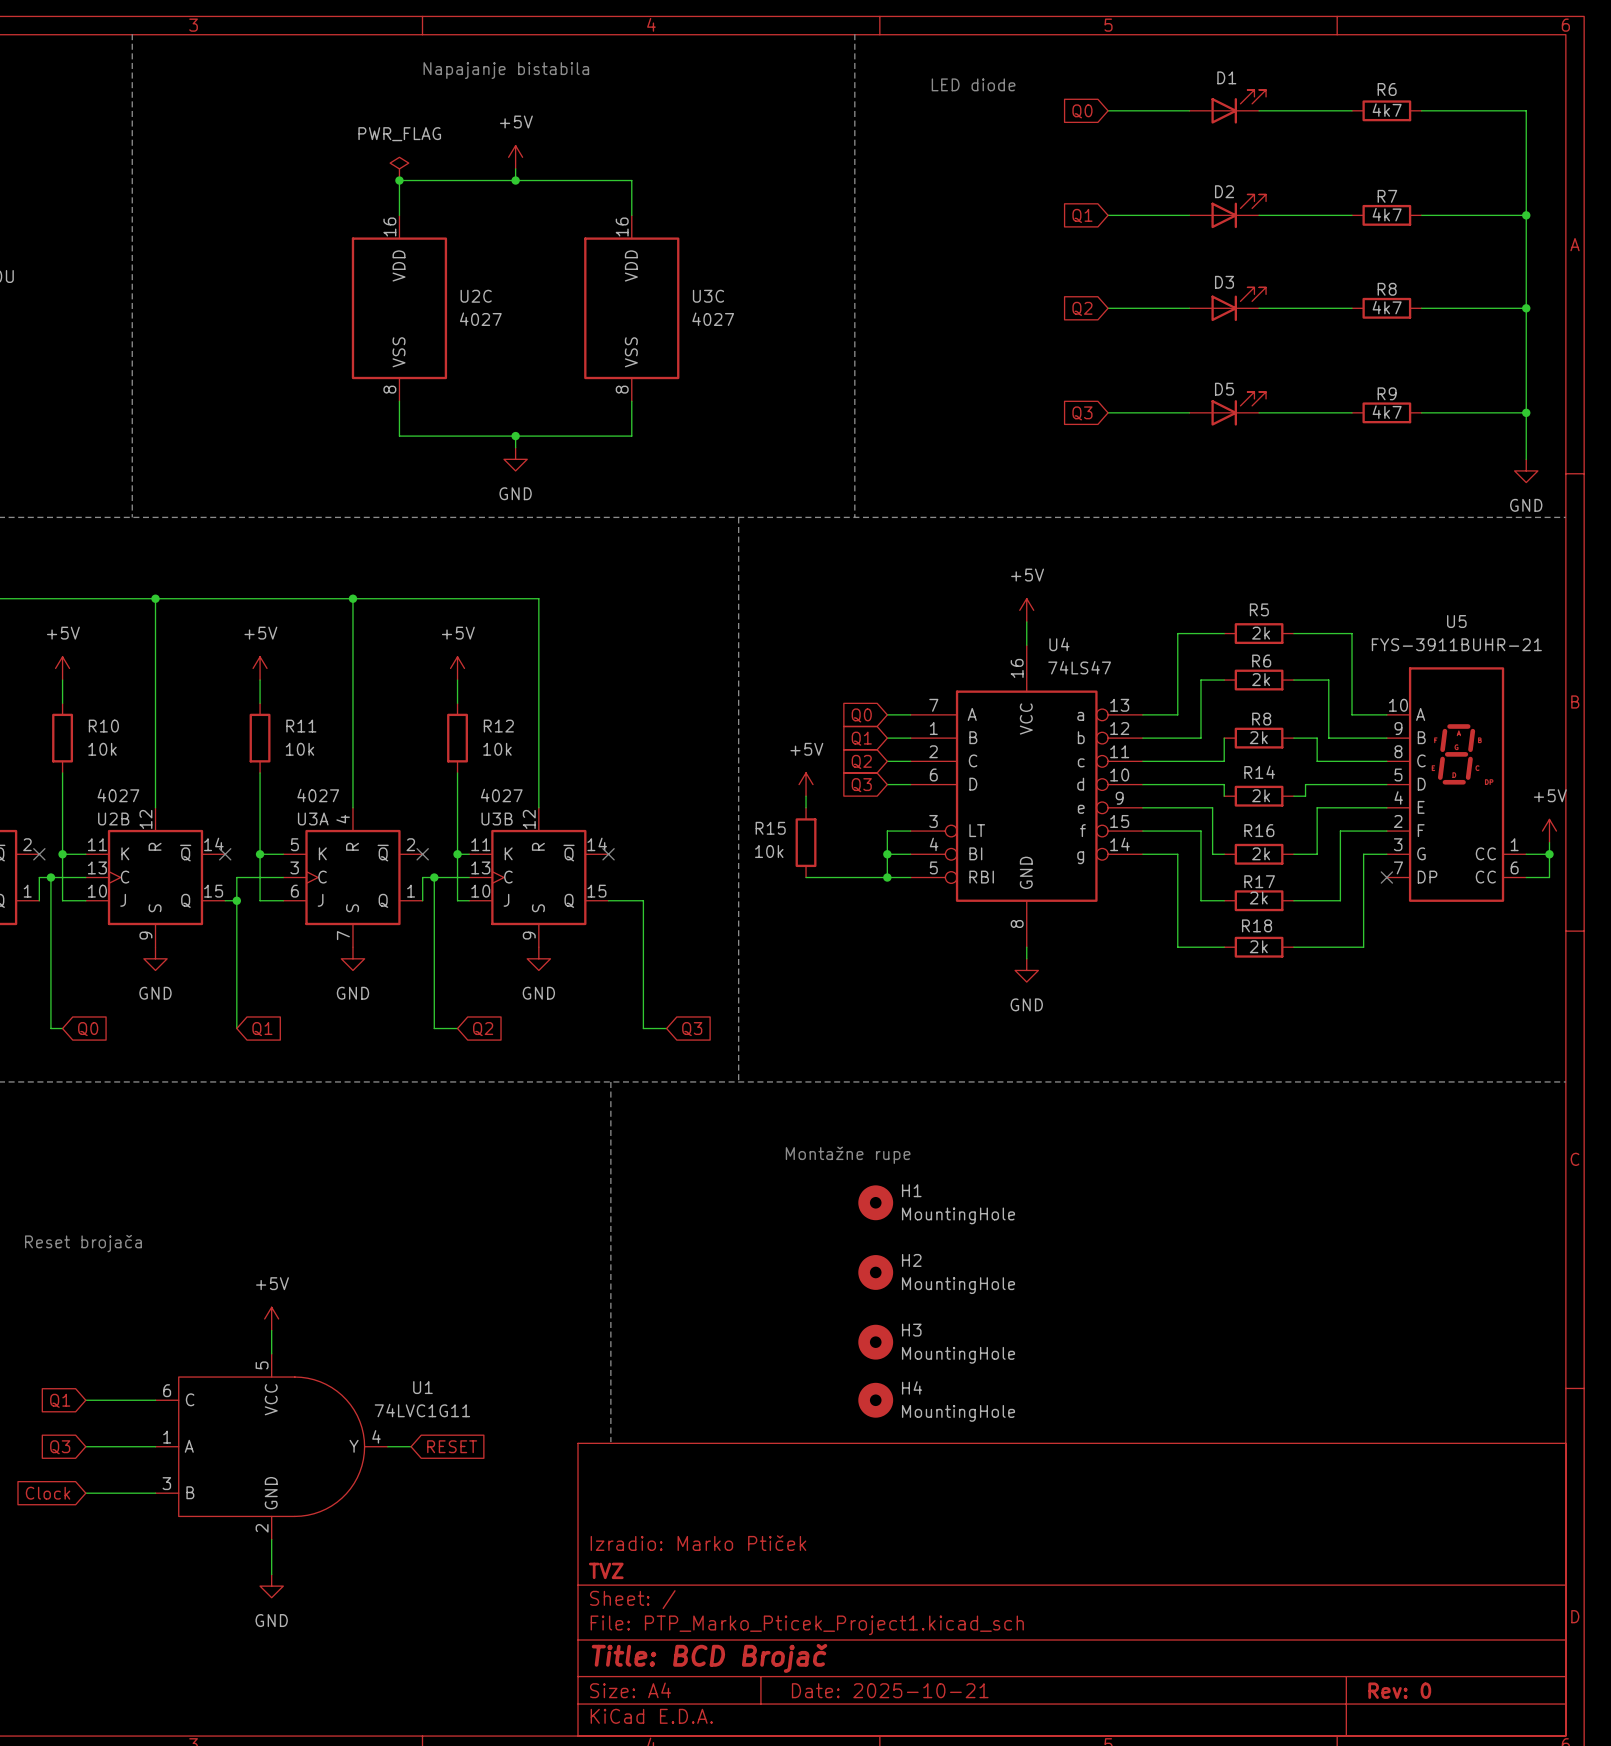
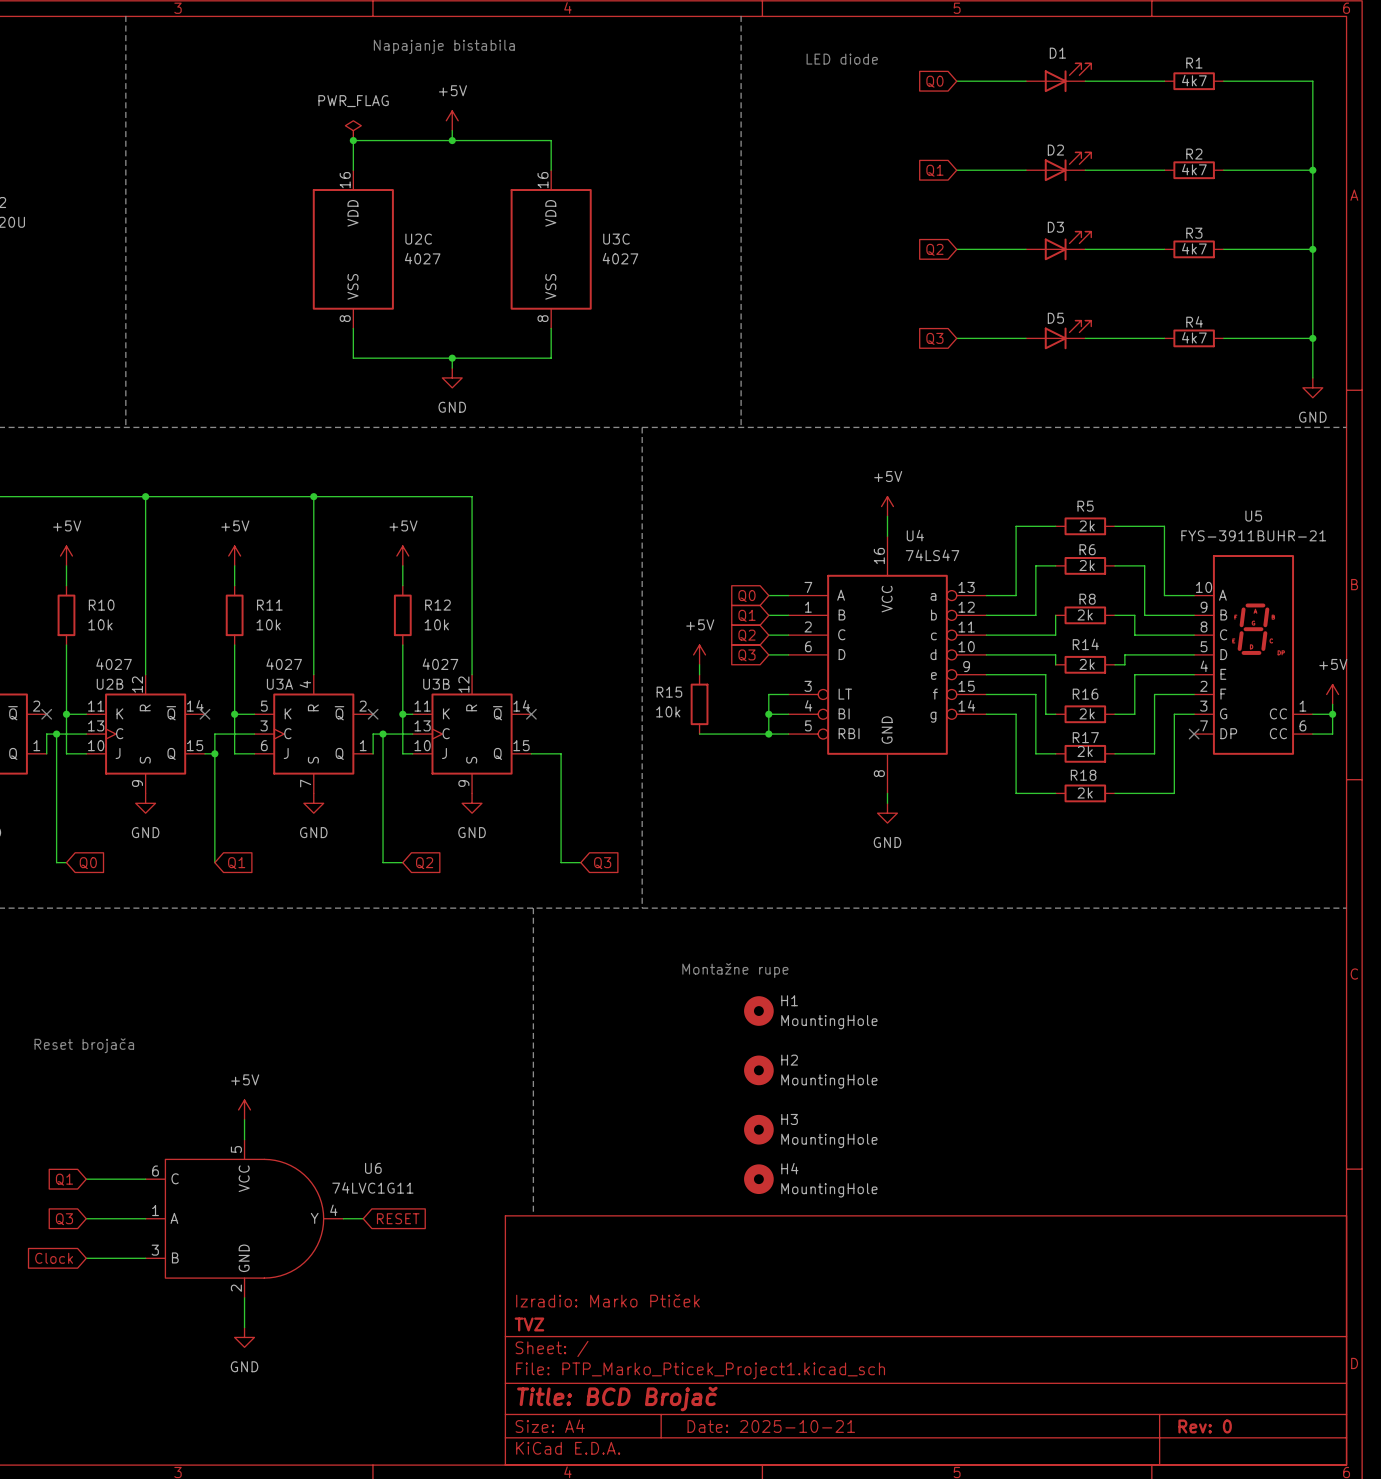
R6 name: R6 (1387, 89) -> R1 (1194, 63)
R7 name: R7 (1387, 196) -> R2 (1194, 154)
R8 name: R8 (1387, 289) -> R3 (1194, 233)
R9 name: R9 (1387, 393) -> R4 (1194, 321)
U1 name: U1 (422, 1387) -> U6 (373, 1168)

